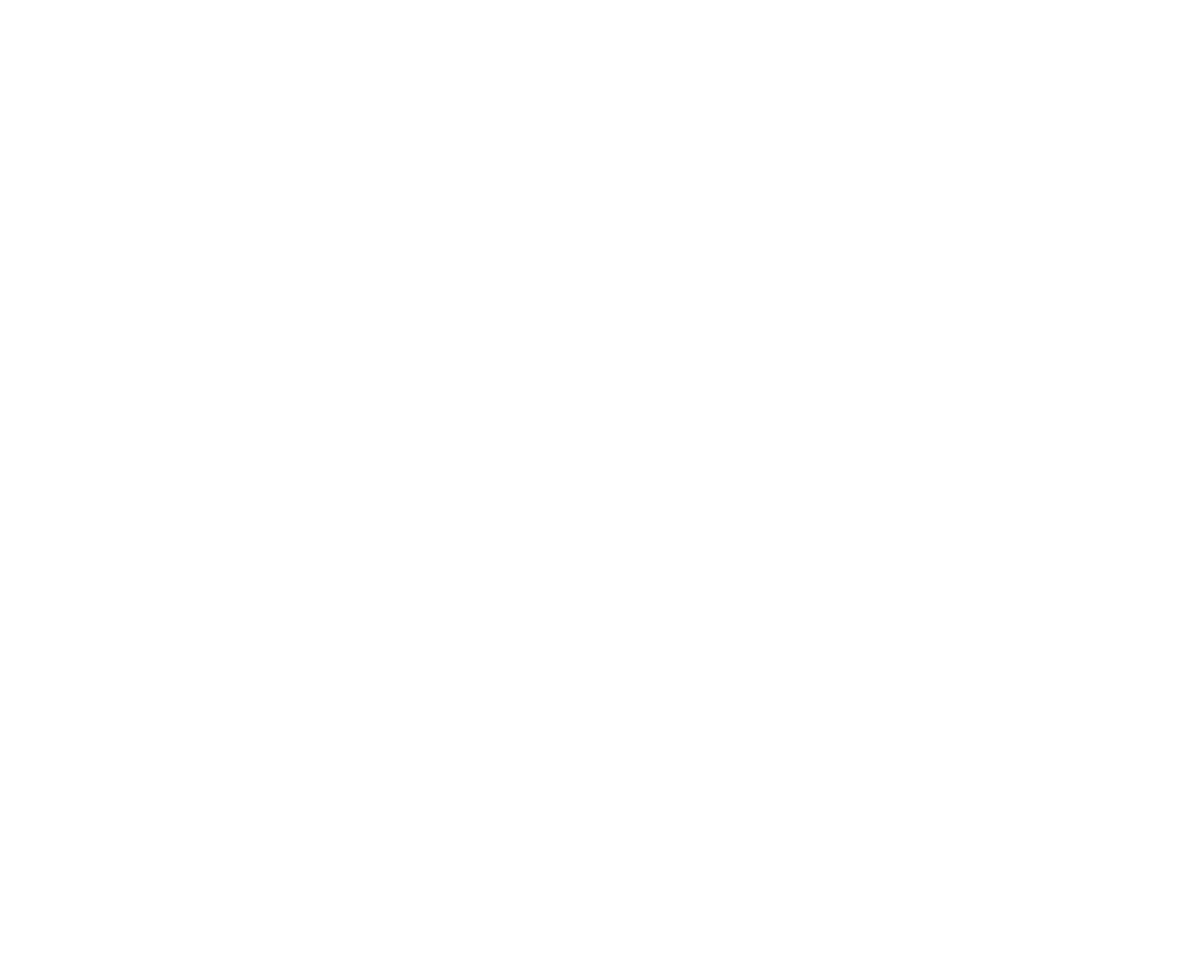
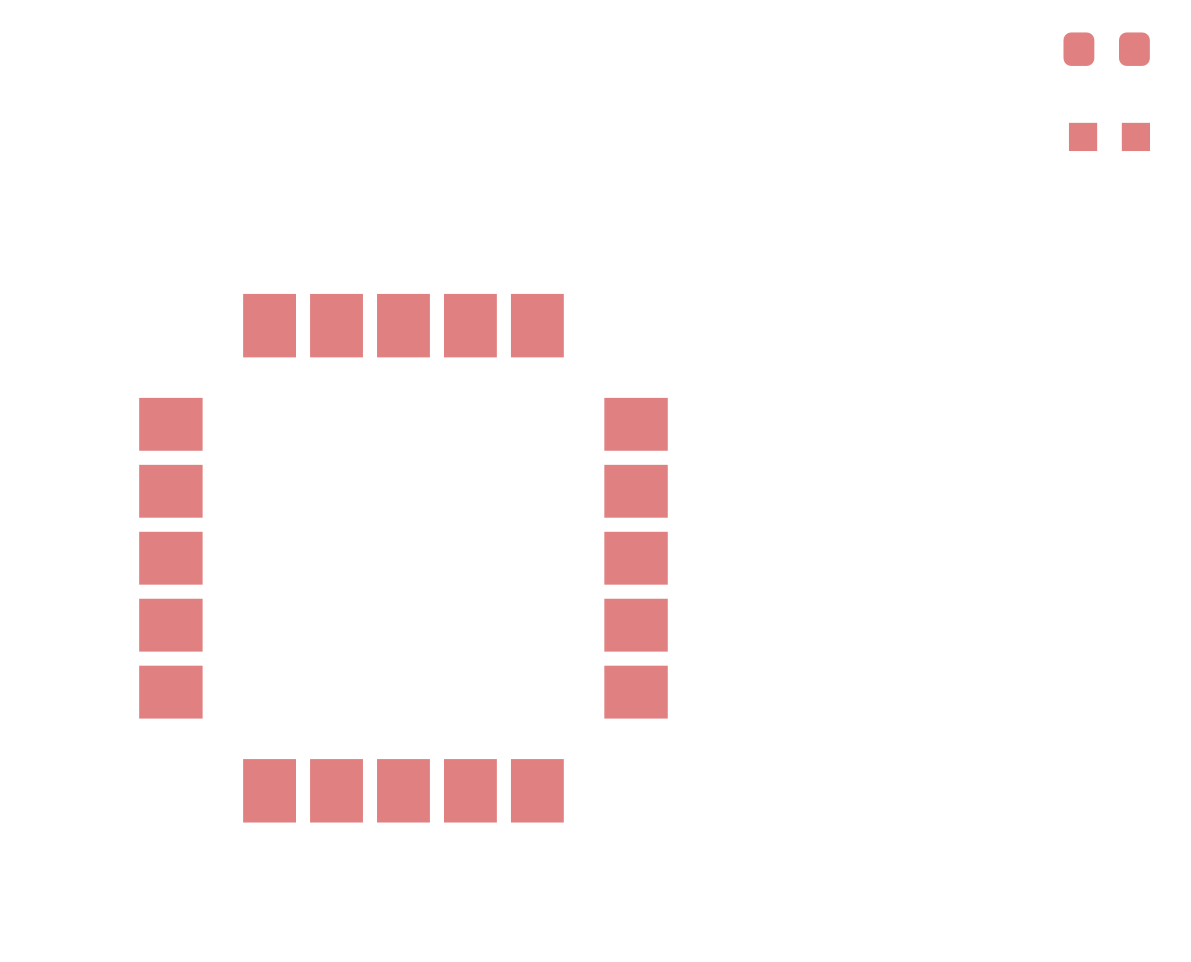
part: none -> (1106, 49)
part: none -> (1109, 136)
part: none -> (403, 558)

